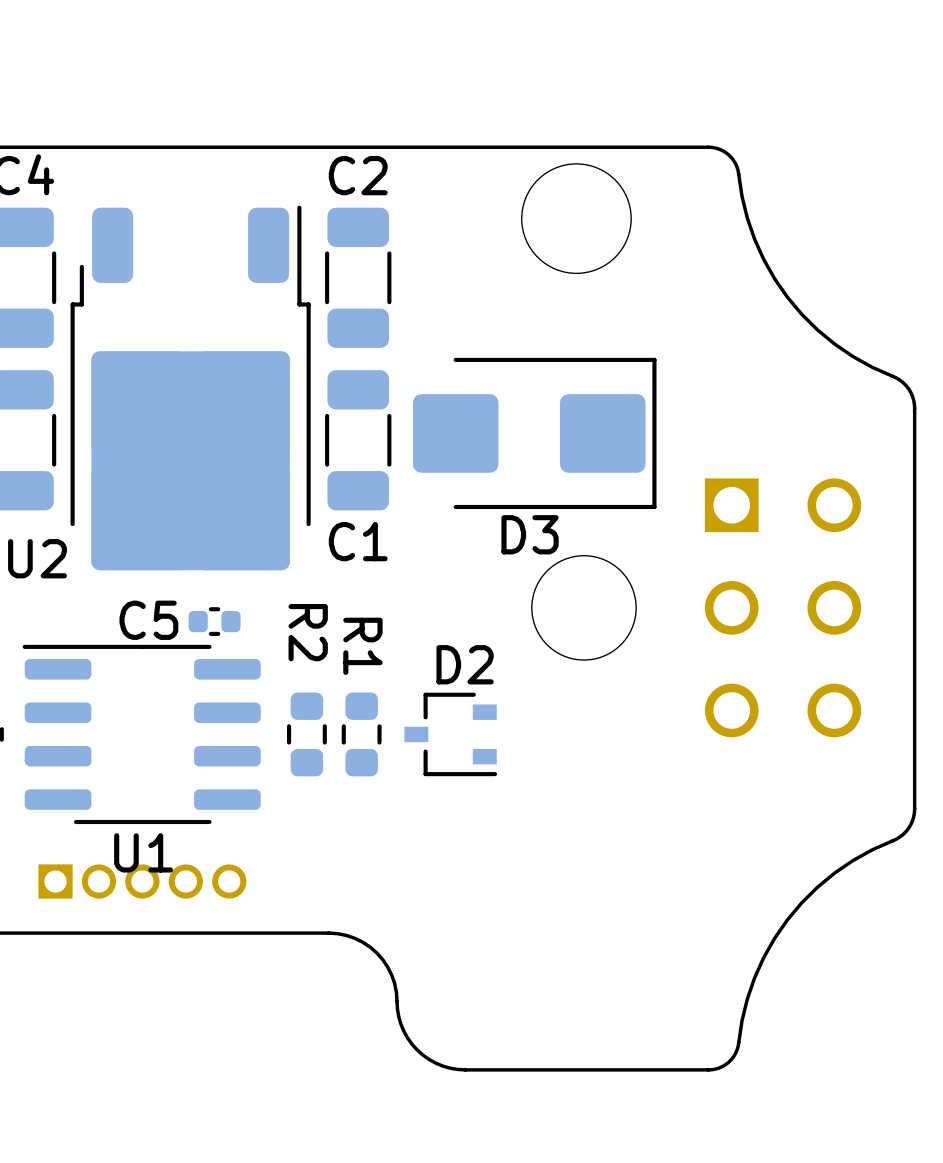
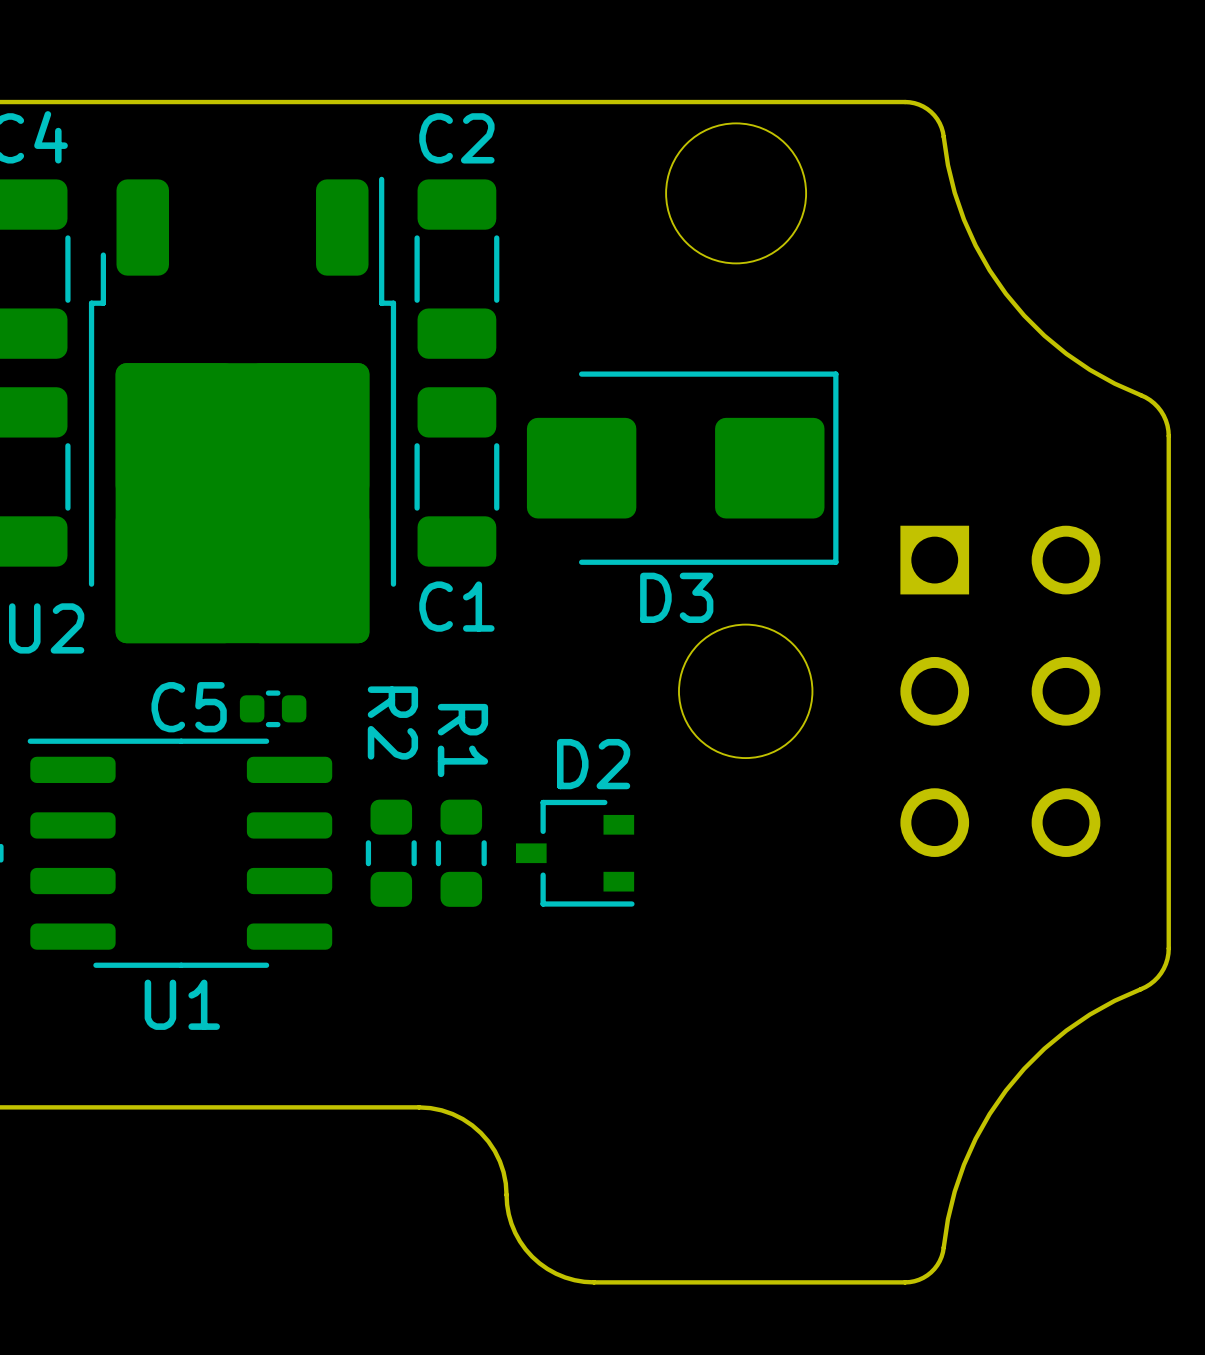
part: (142, 881) -> none

